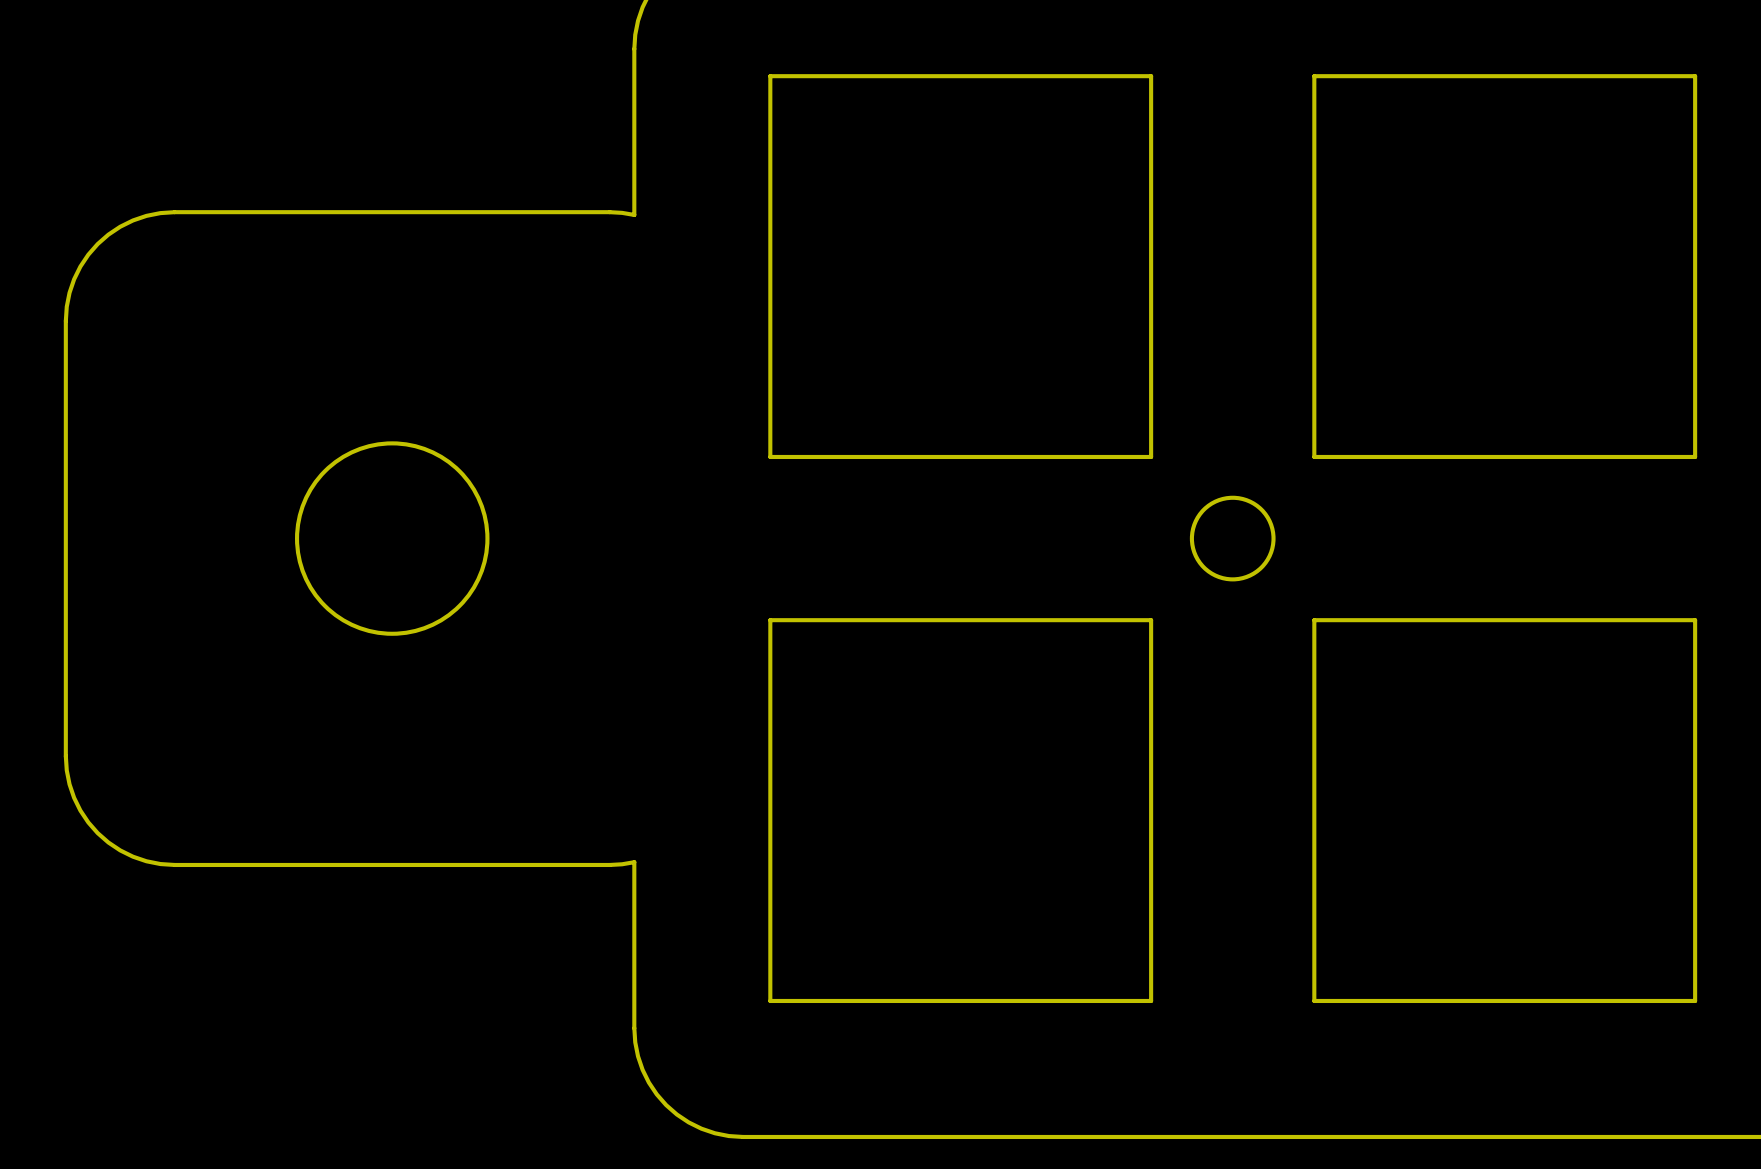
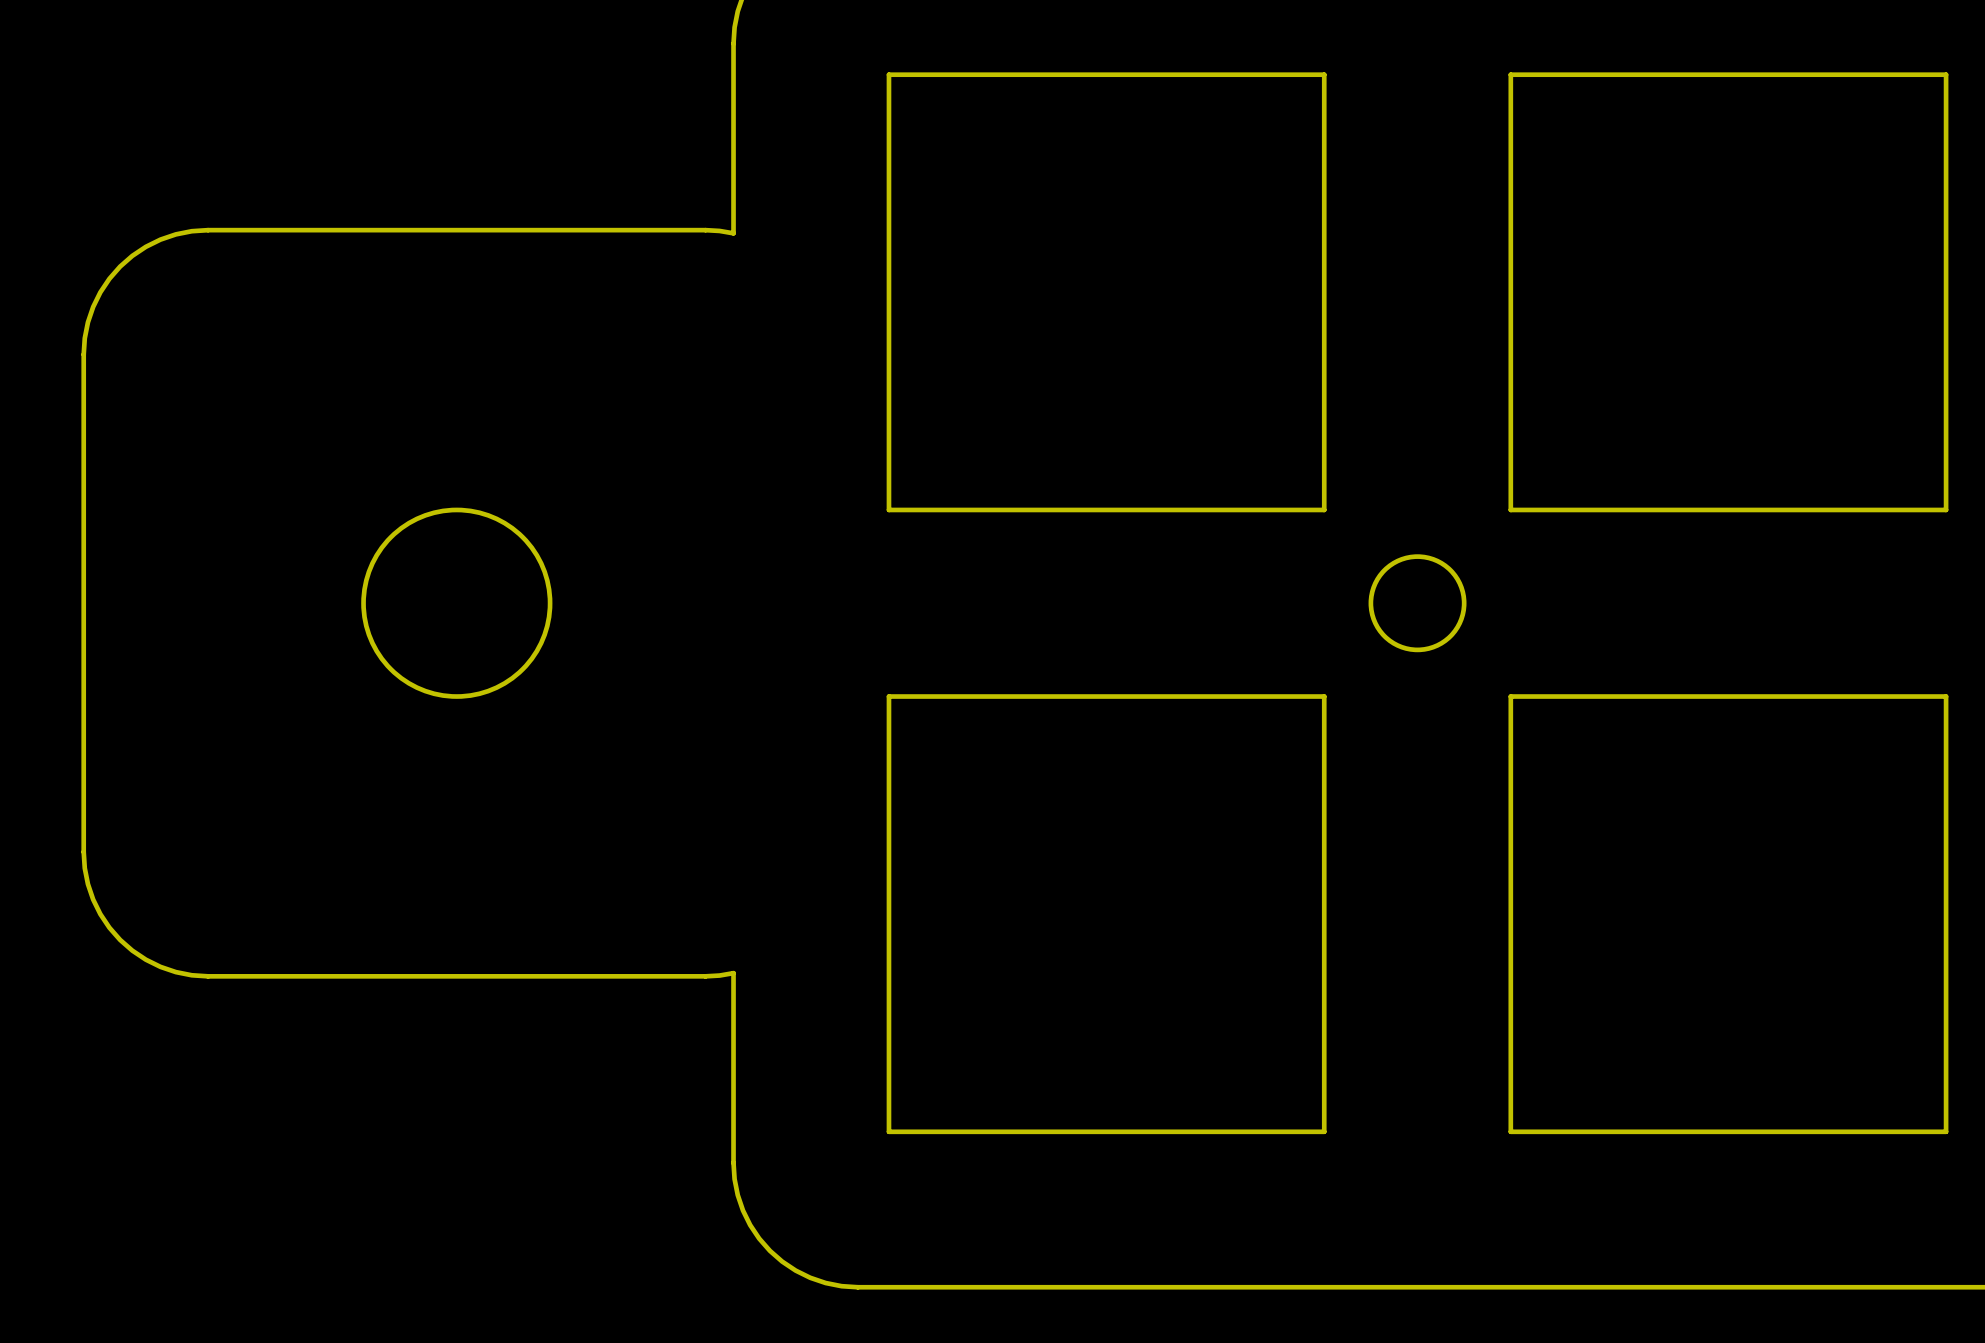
round board edge size: [295, 441, 490, 636] -> [361, 507, 553, 699]

